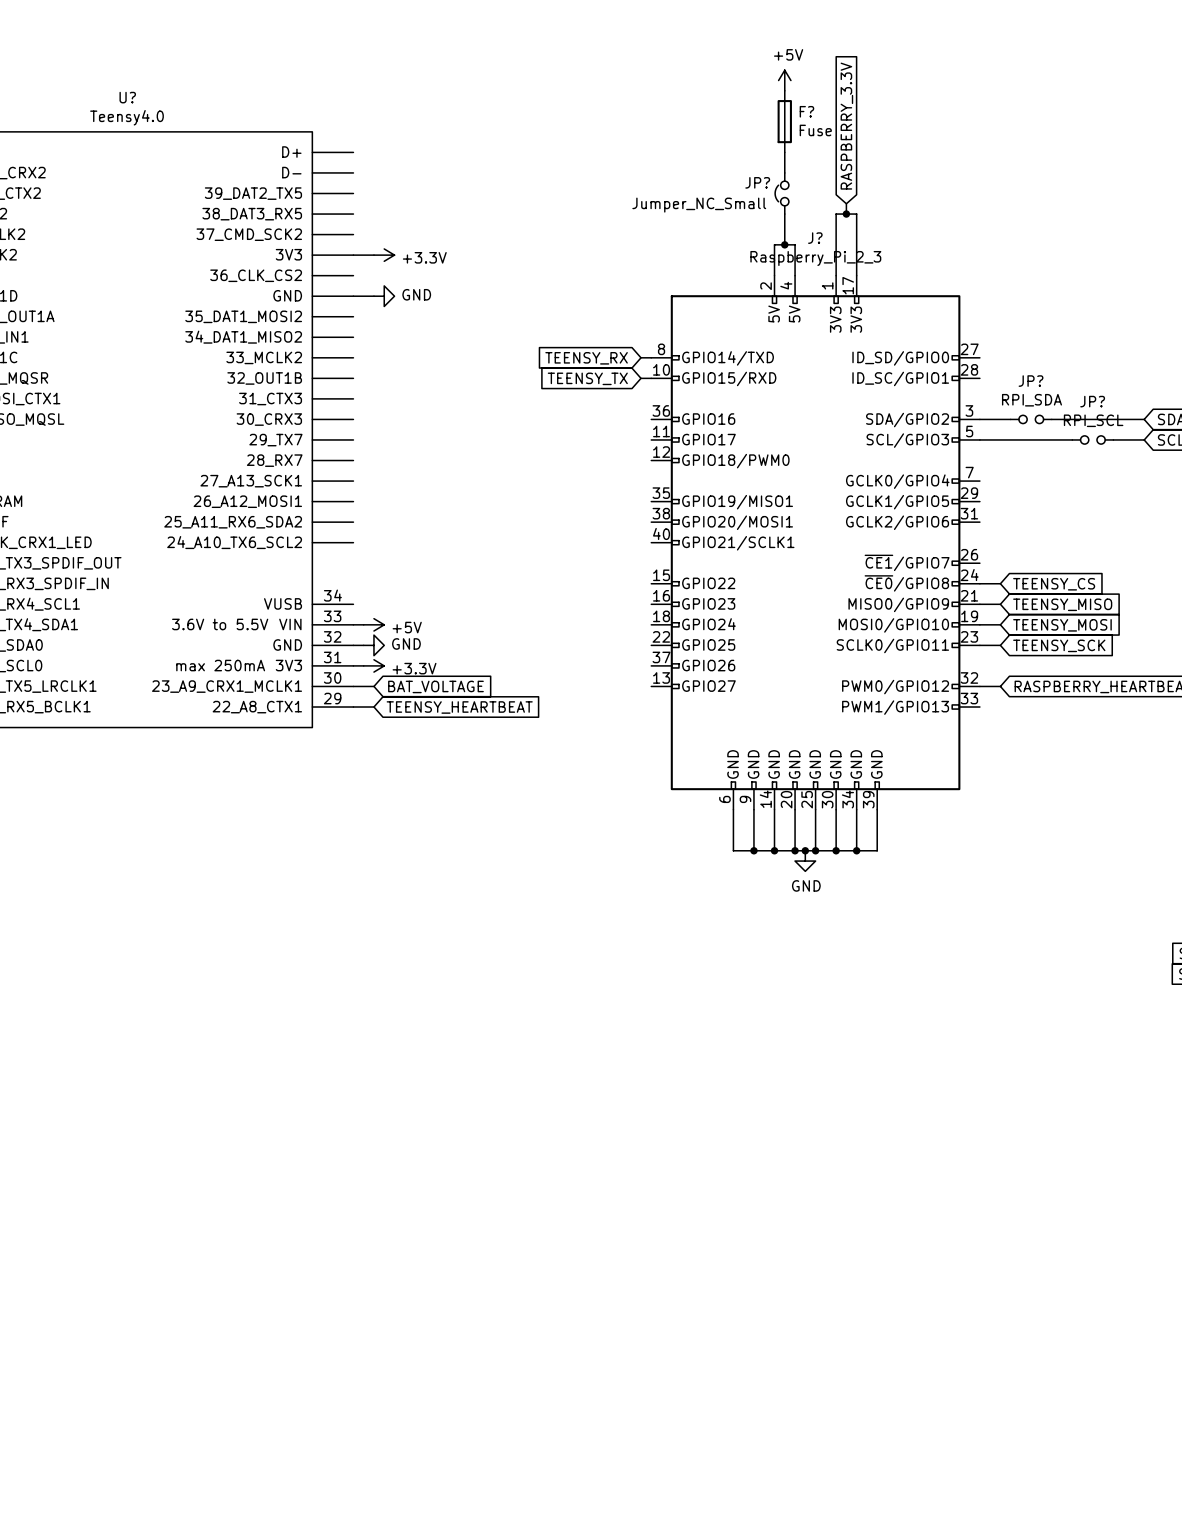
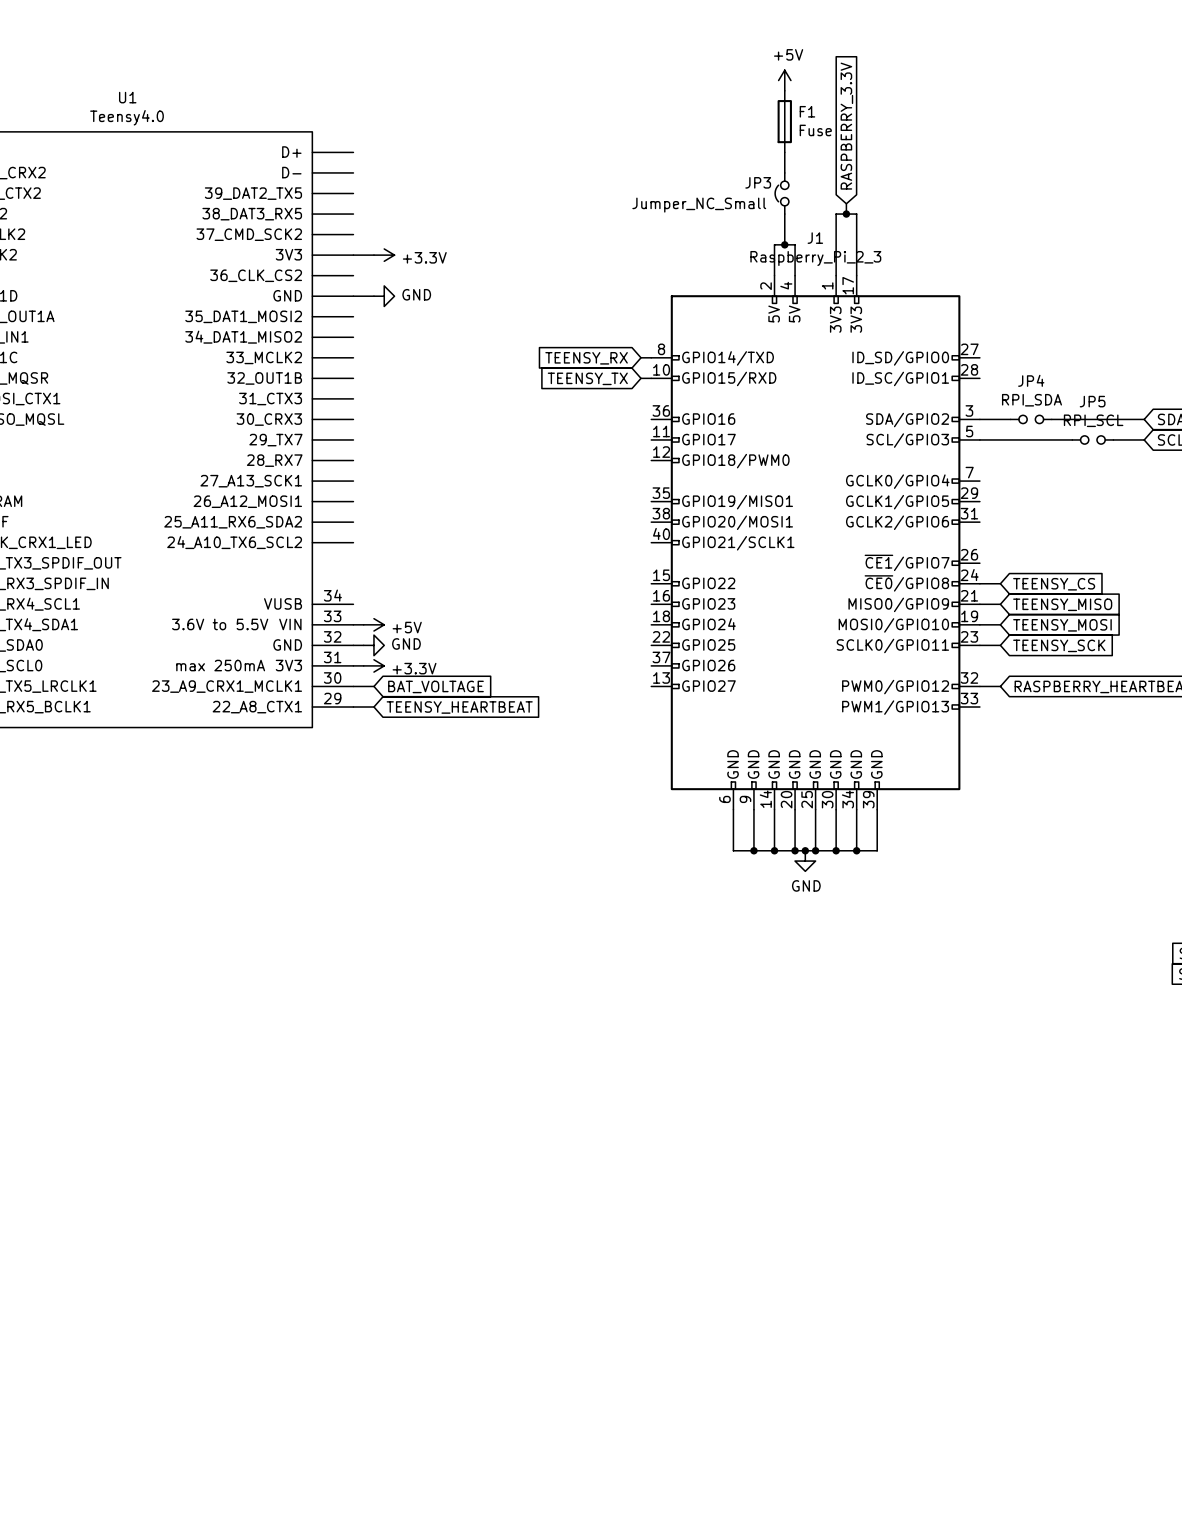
U? name: U? (127, 97) -> U1 (127, 97)
F? name: F? (806, 111) -> F1 (807, 111)
JP? name: JP? (757, 182) -> JP3 (758, 182)
J? name: J? (815, 238) -> J1 (815, 238)
JP? name: JP? (1031, 381) -> JP4 (1031, 380)
JP? name: JP? (1092, 401) -> JP5 (1092, 401)

